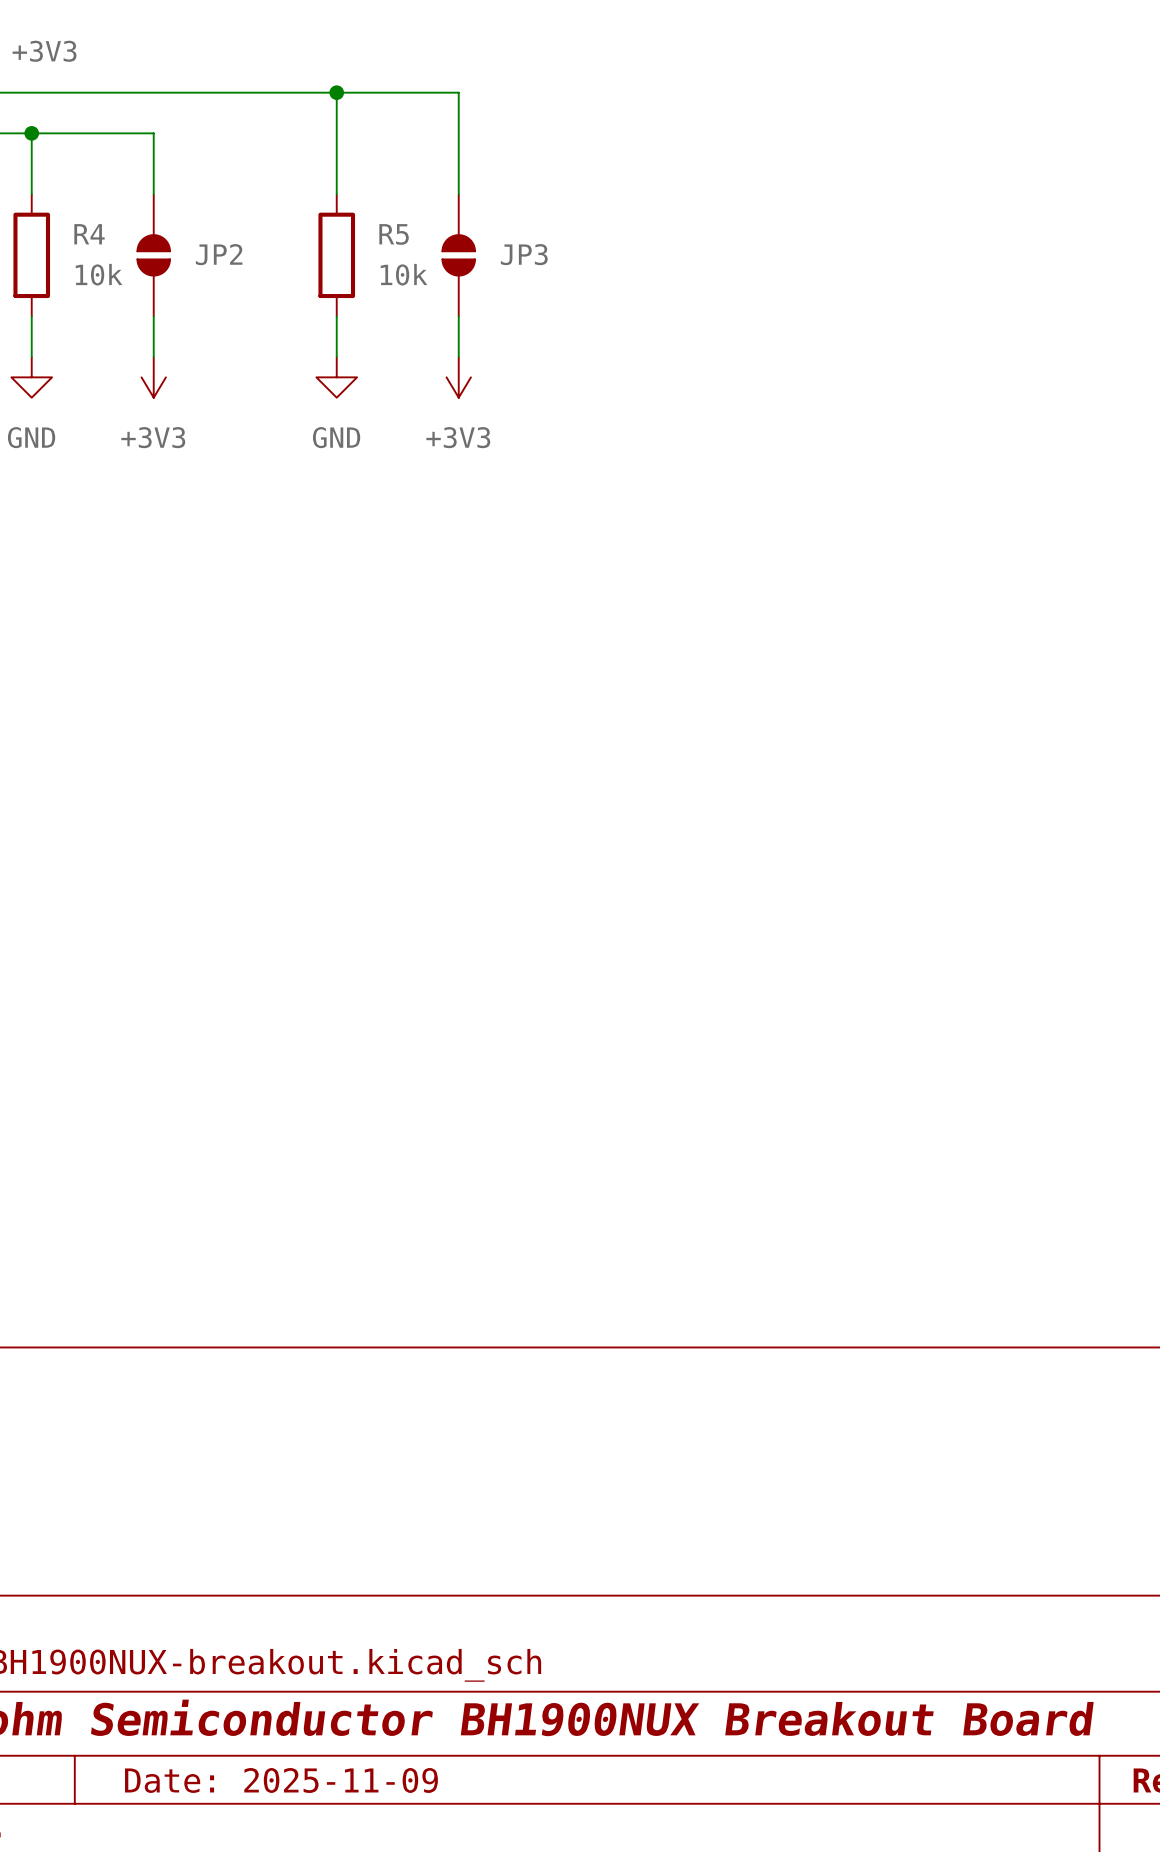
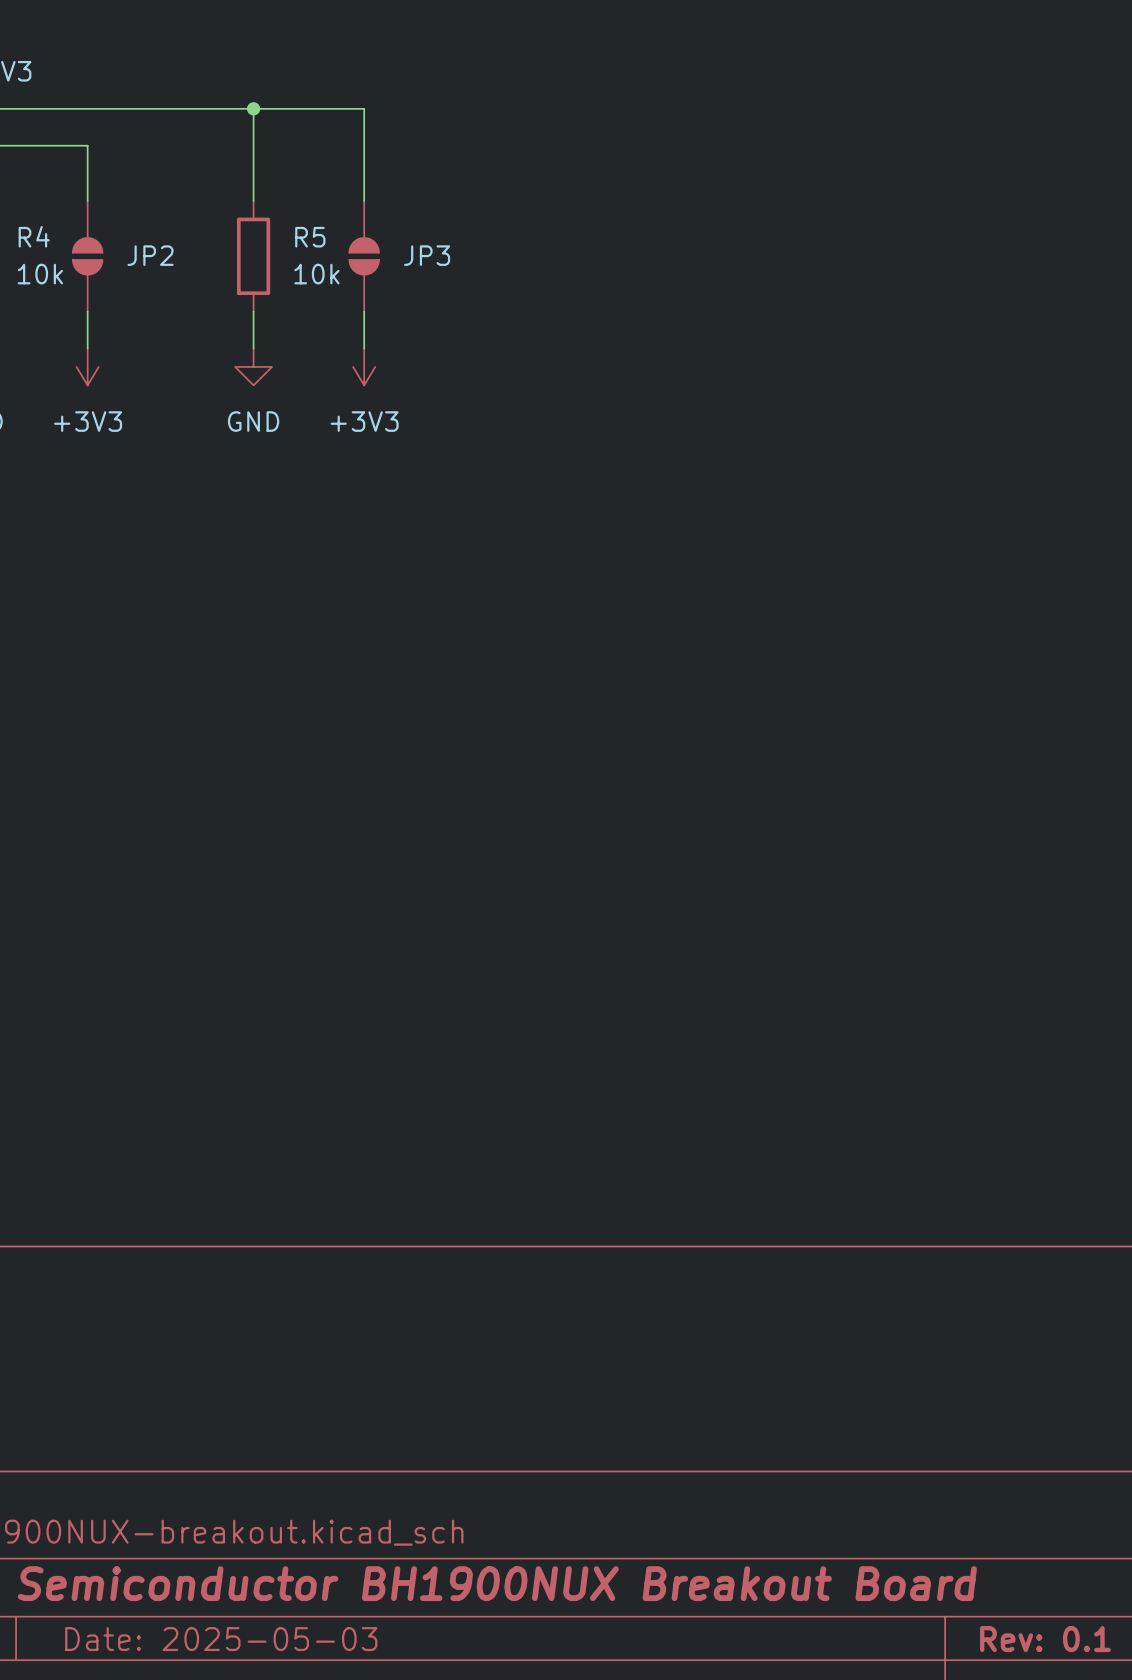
title block: Date: 2025-11-09 (281, 1780) -> Date: 2025-05-03 (221, 1639)

